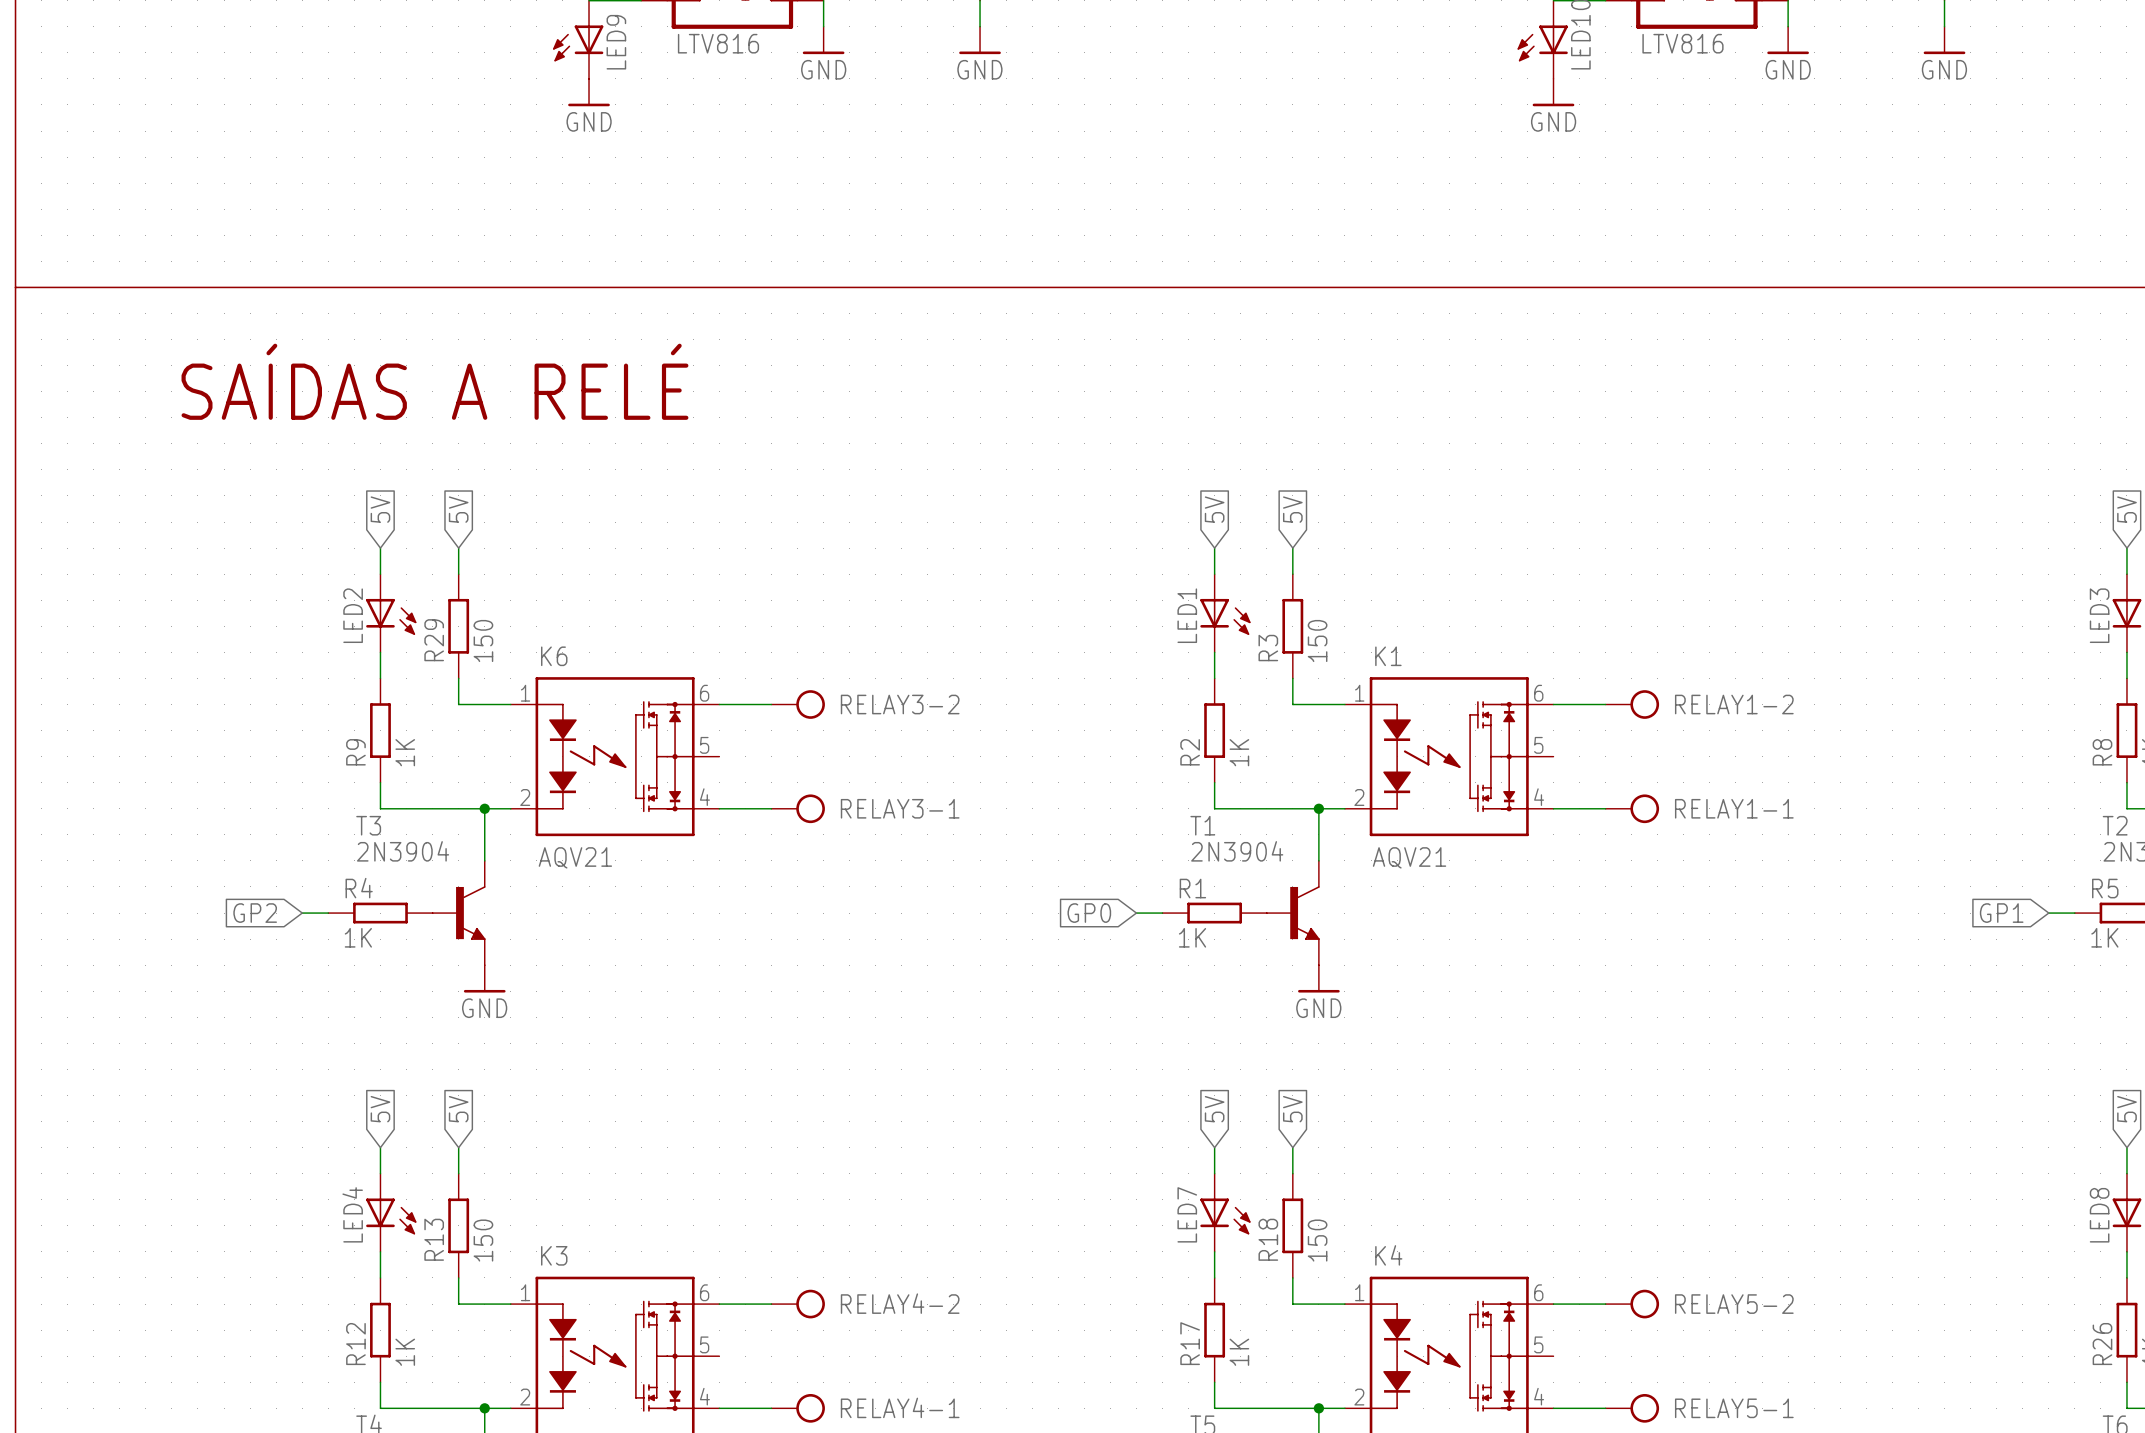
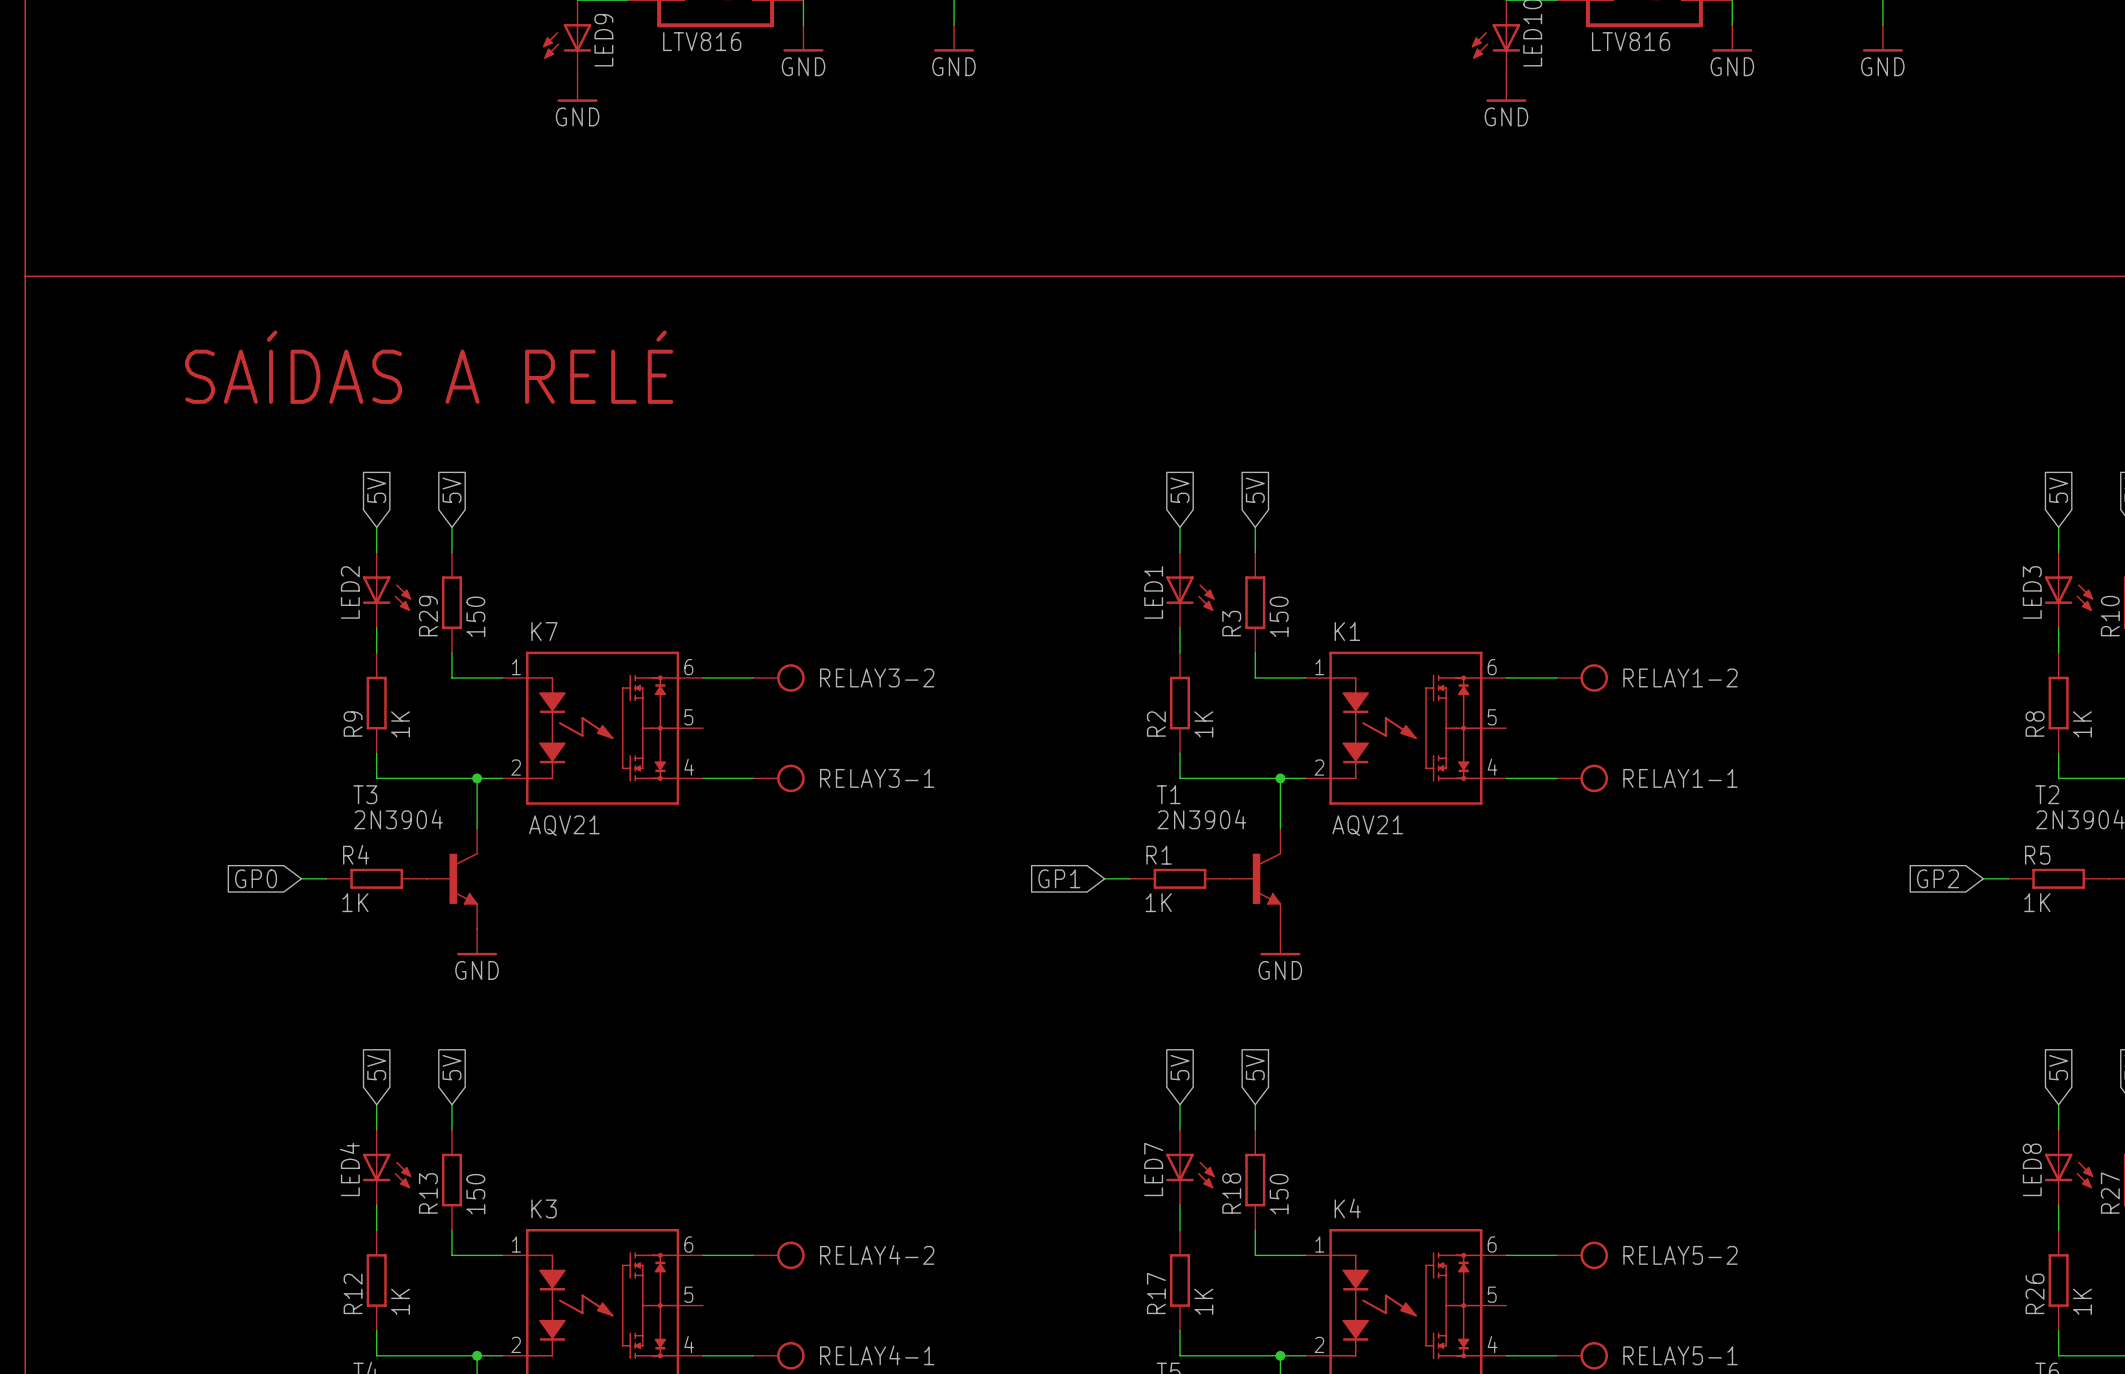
K6 name: K6 (554, 656) -> K7 (544, 631)
global label: GP2 (255, 913) -> GP0 (256, 878)
global label: GP0 (1089, 913) -> GP1 (1059, 878)
global label: GP1 (2001, 913) -> GP2 (1937, 878)

